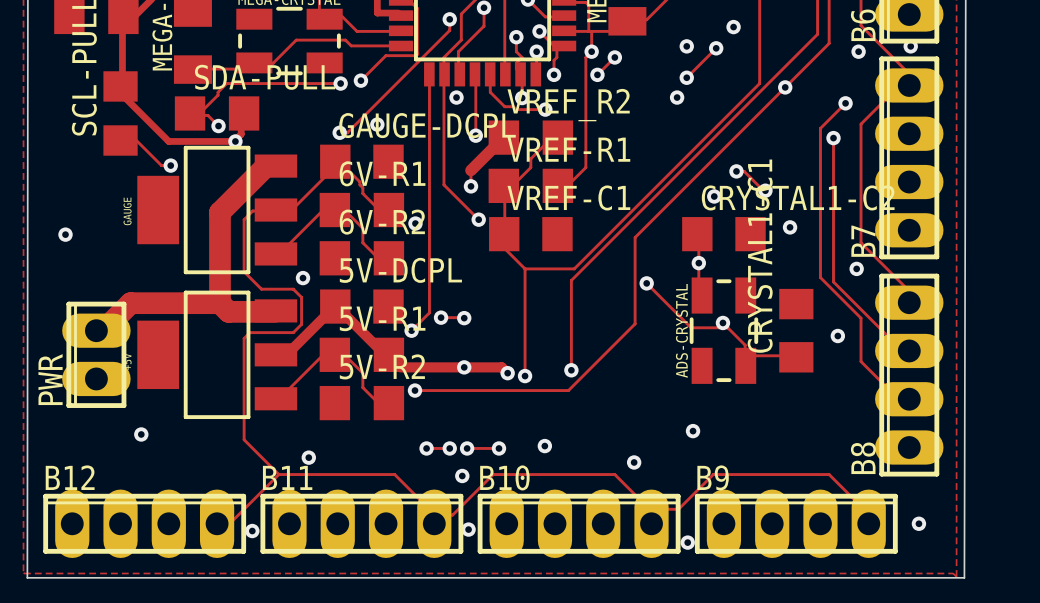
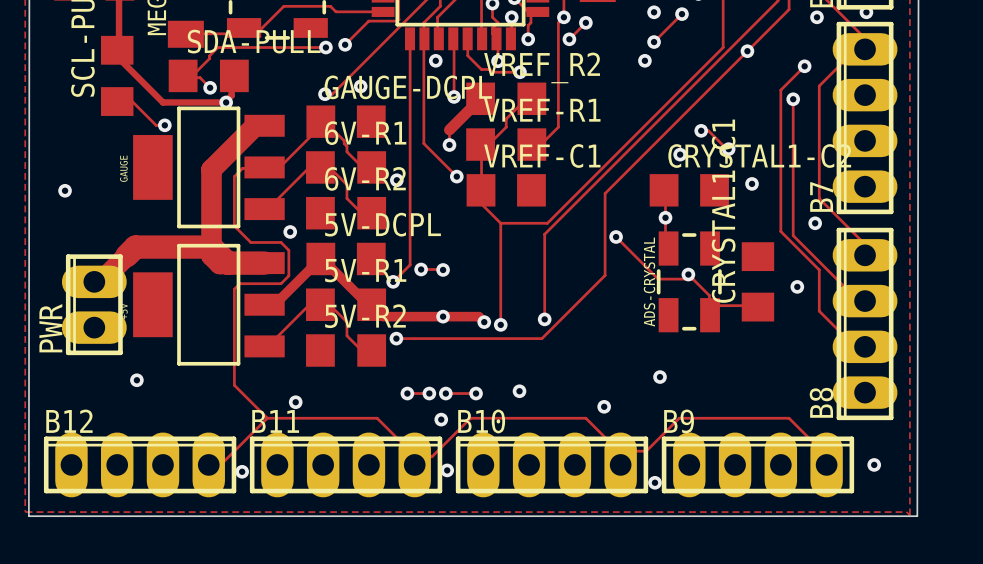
track: (130, 303) (219, 303) -> (126, 255) (135, 247) (211, 247) (227, 263) (264, 263)

